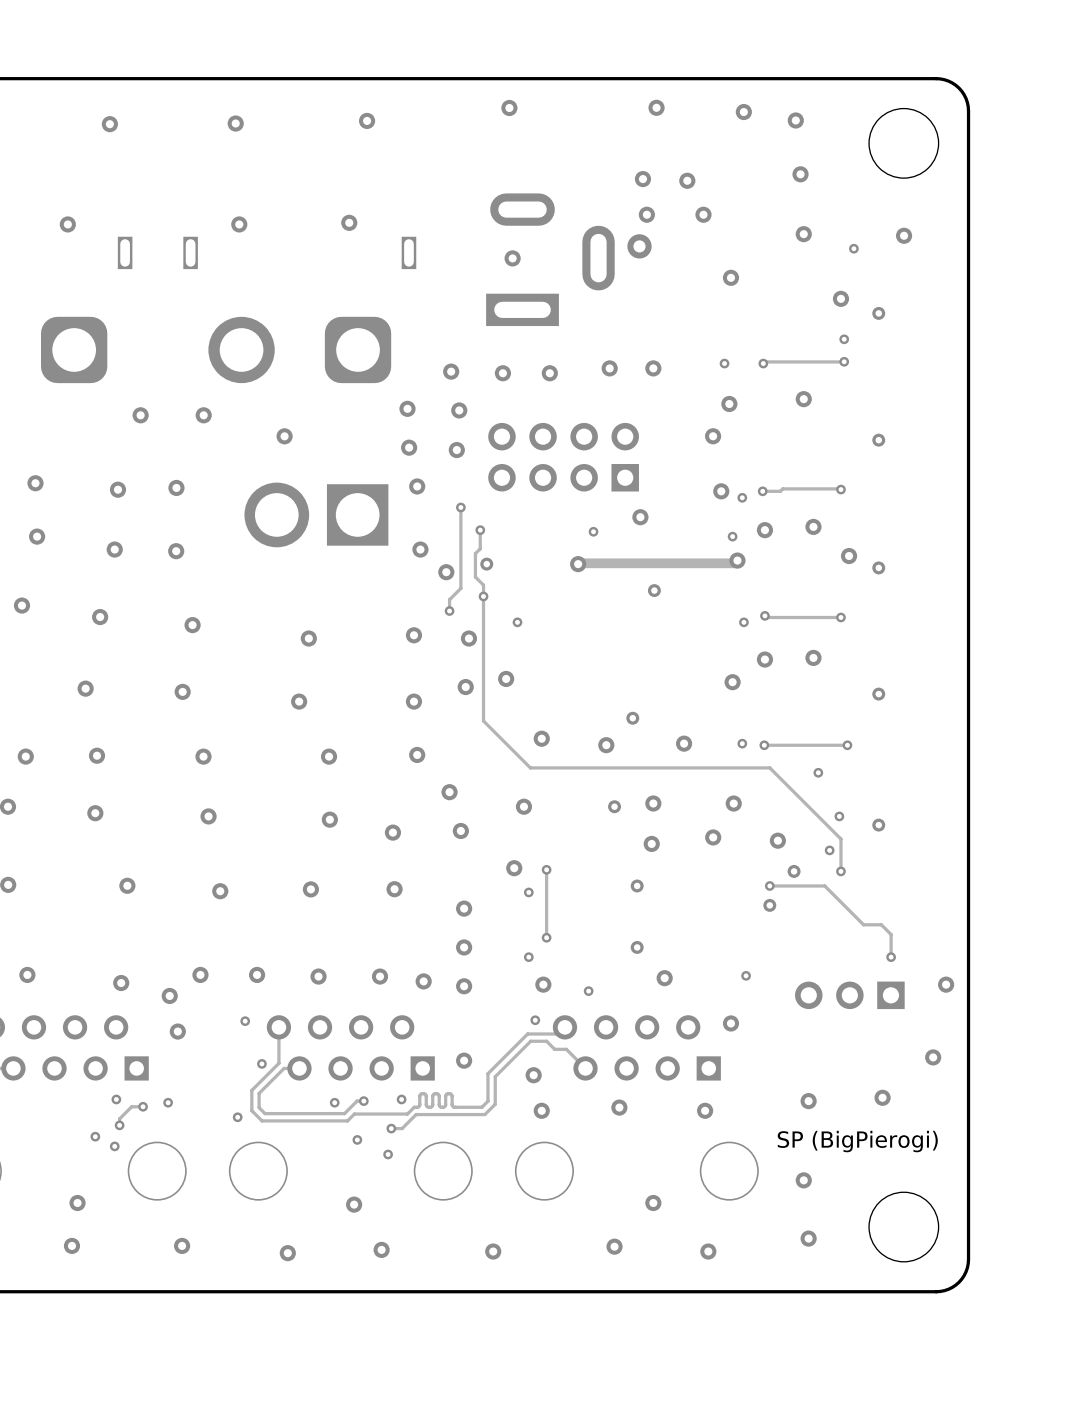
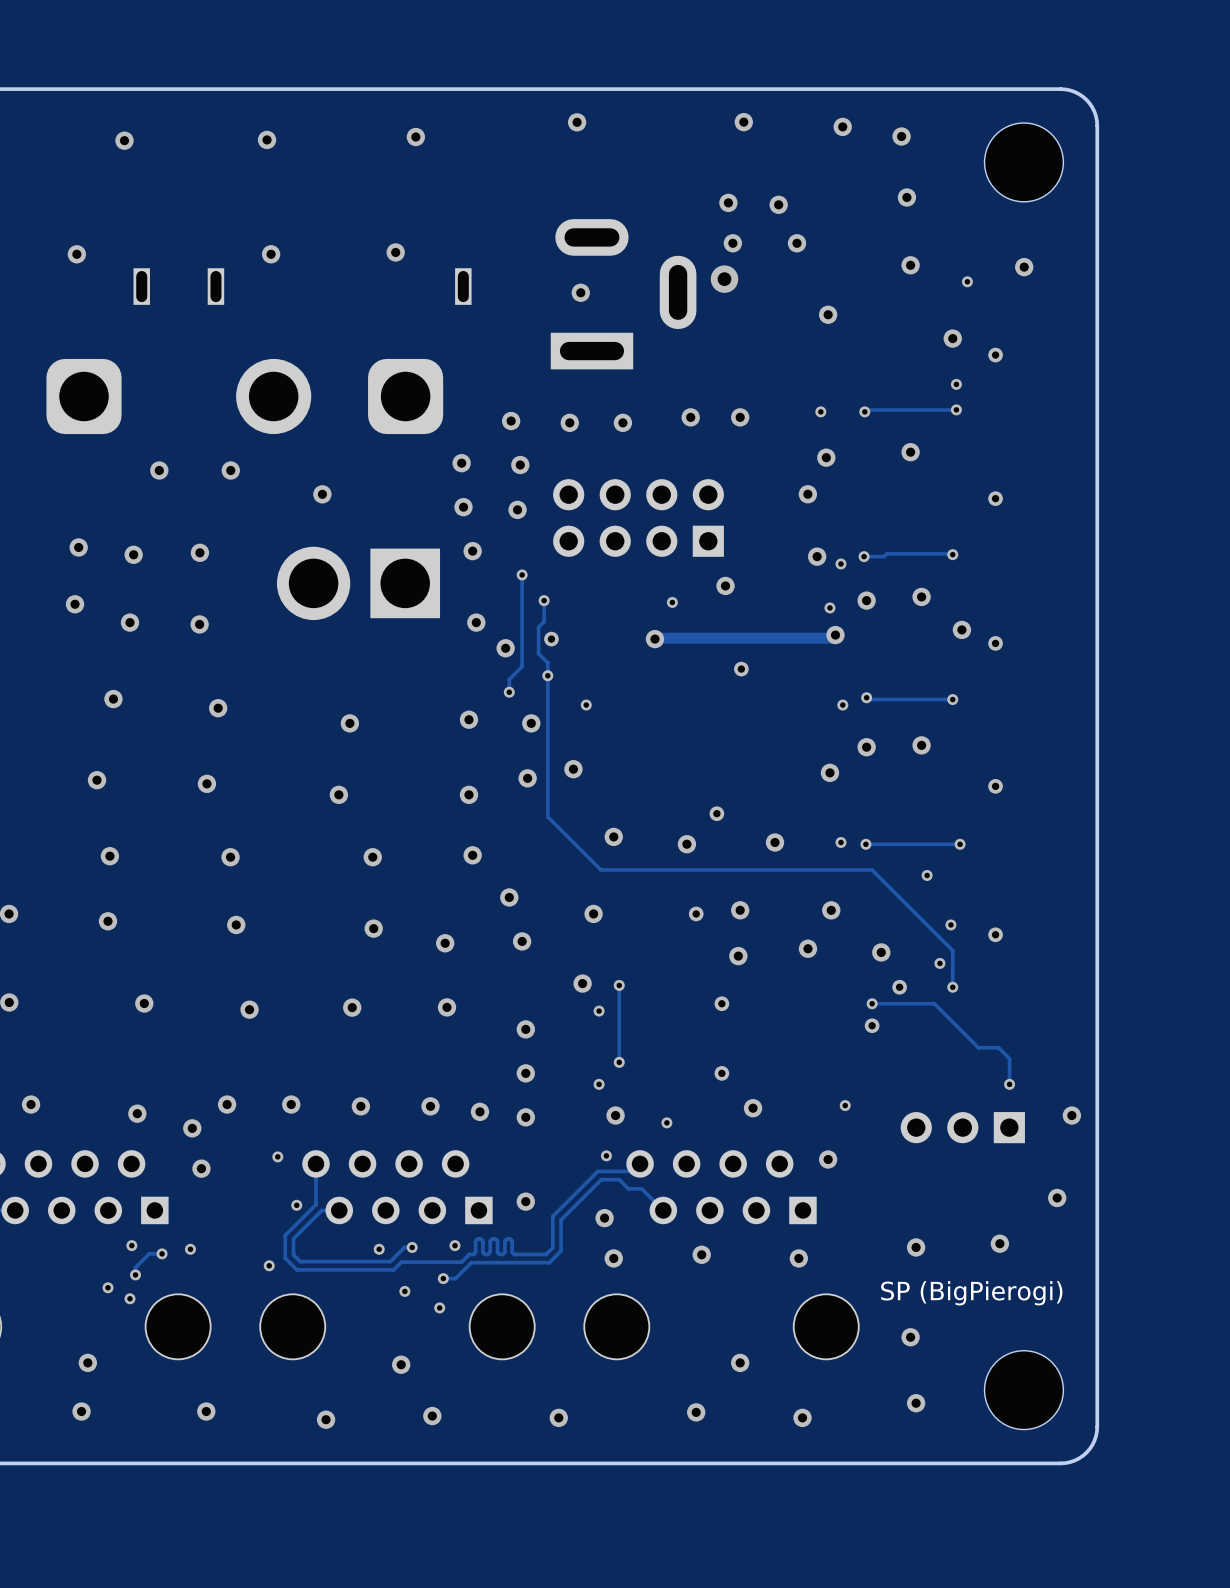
via: (35, 483) -> none
via: none -> (78, 547)
via: none -> (75, 604)
via: (37, 536) -> none
via: (21, 605) -> none
via: (25, 756) -> none

